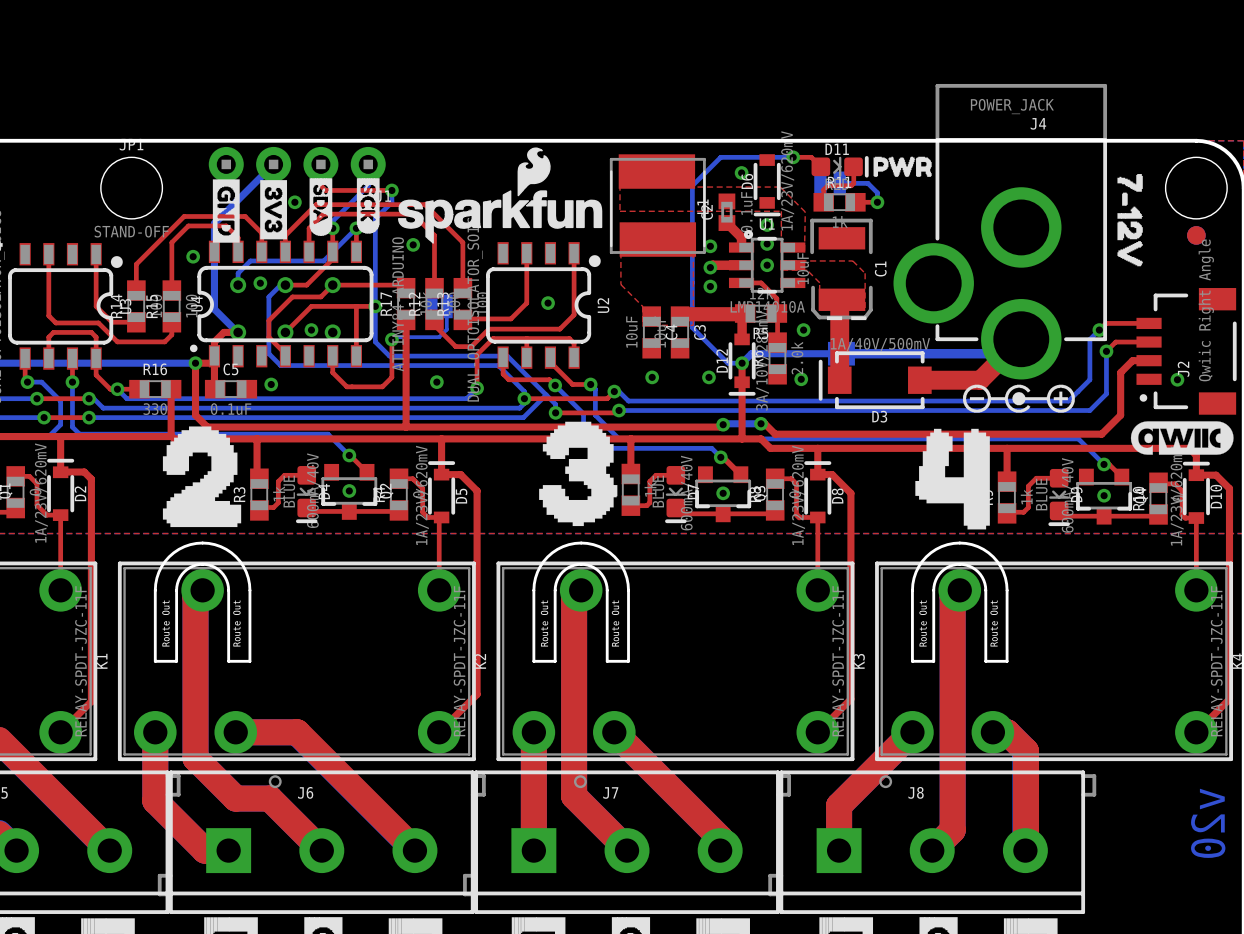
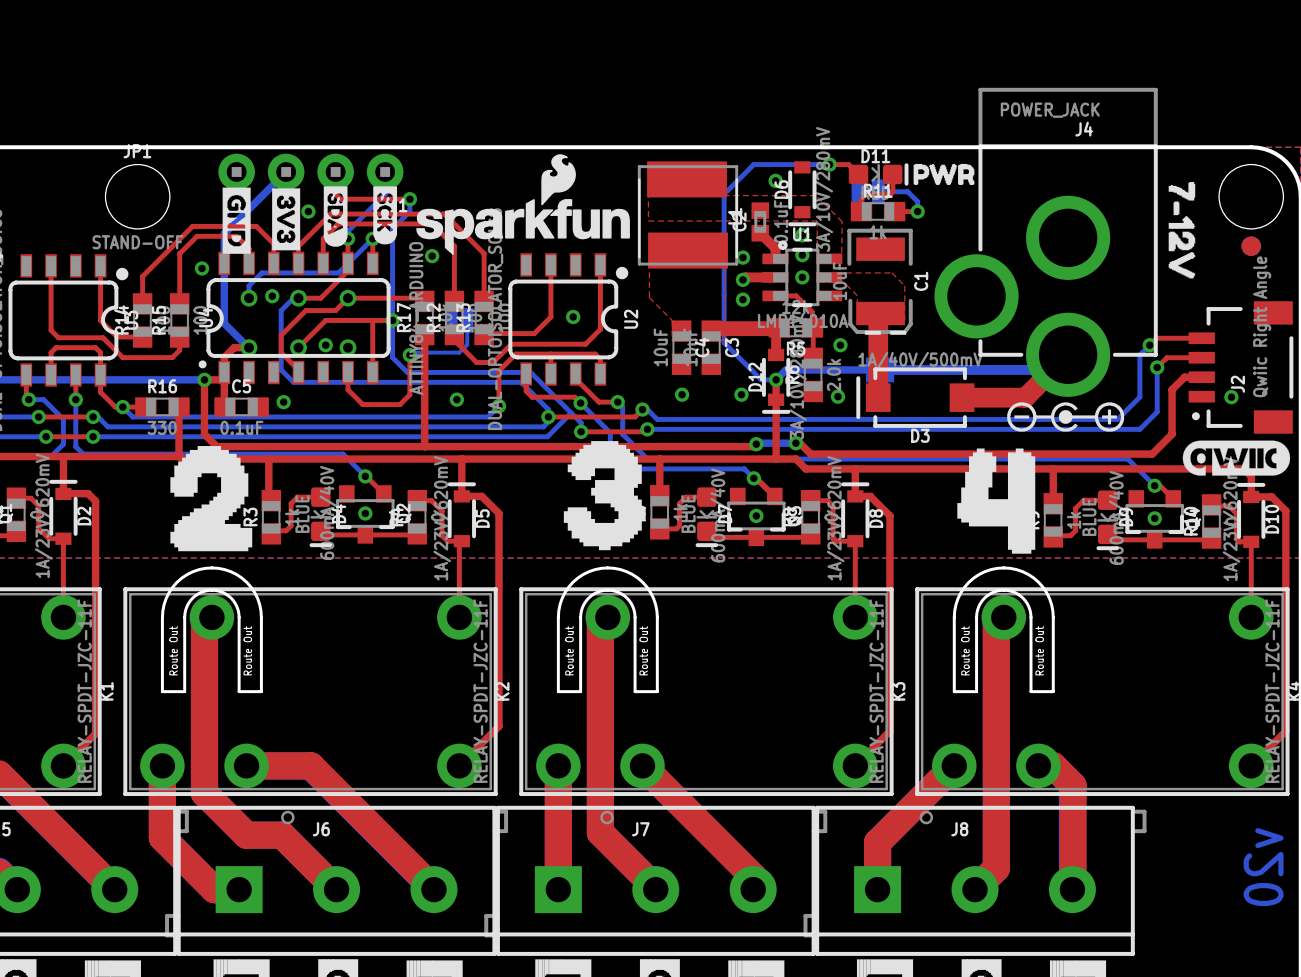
D6 value: 1A/23V/620mV (787, 180) -> 3A/10V/280mV (824, 189)

